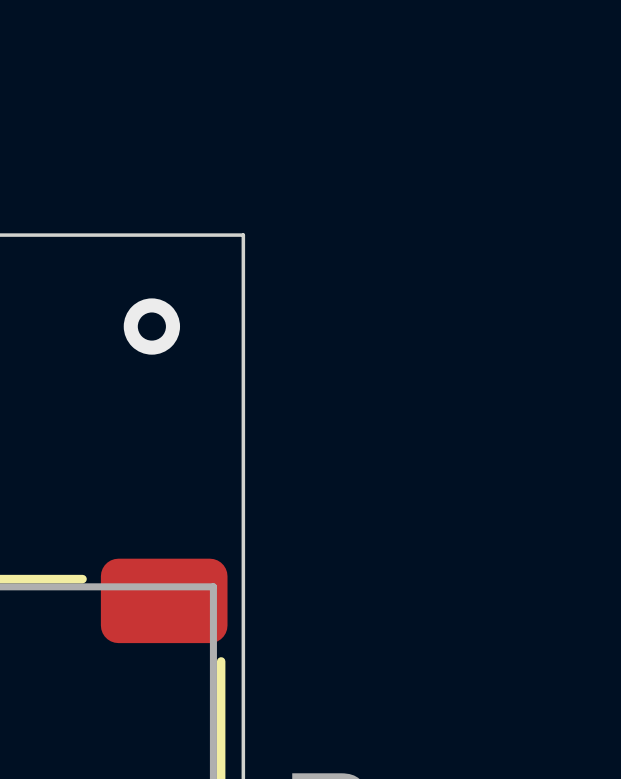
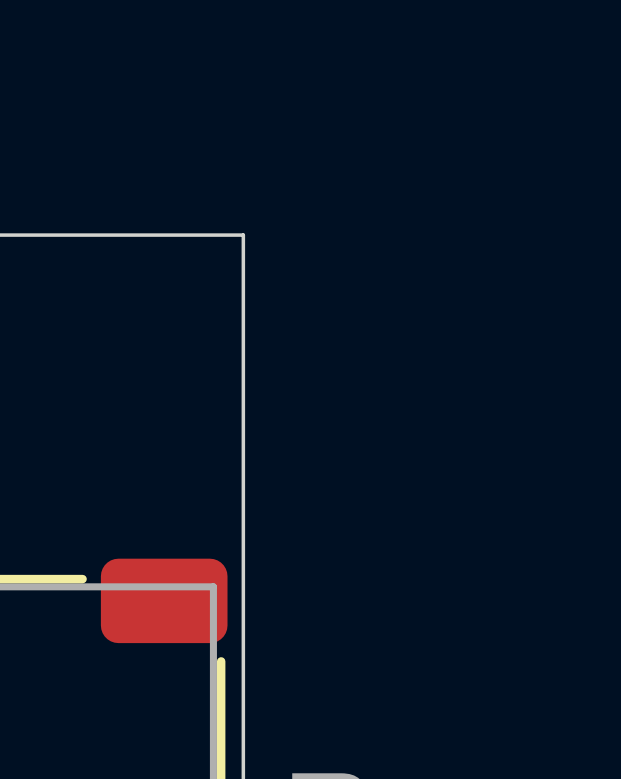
via: (151, 326) -> none

